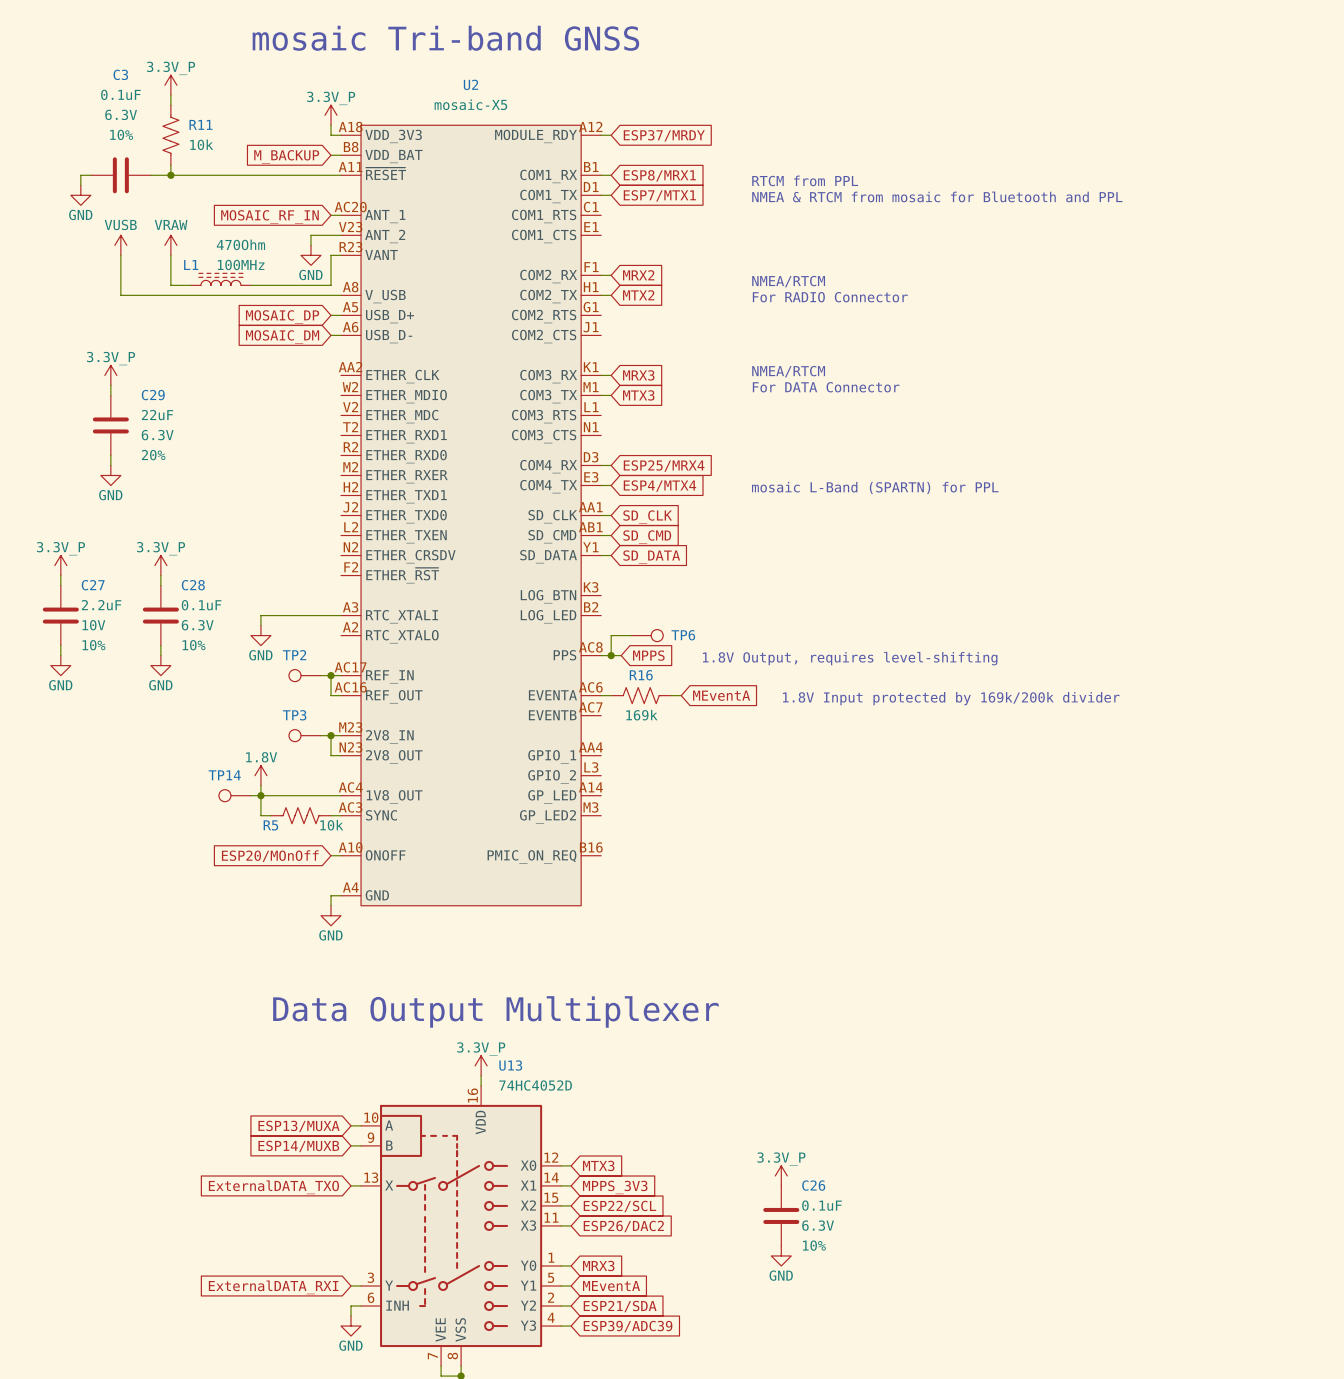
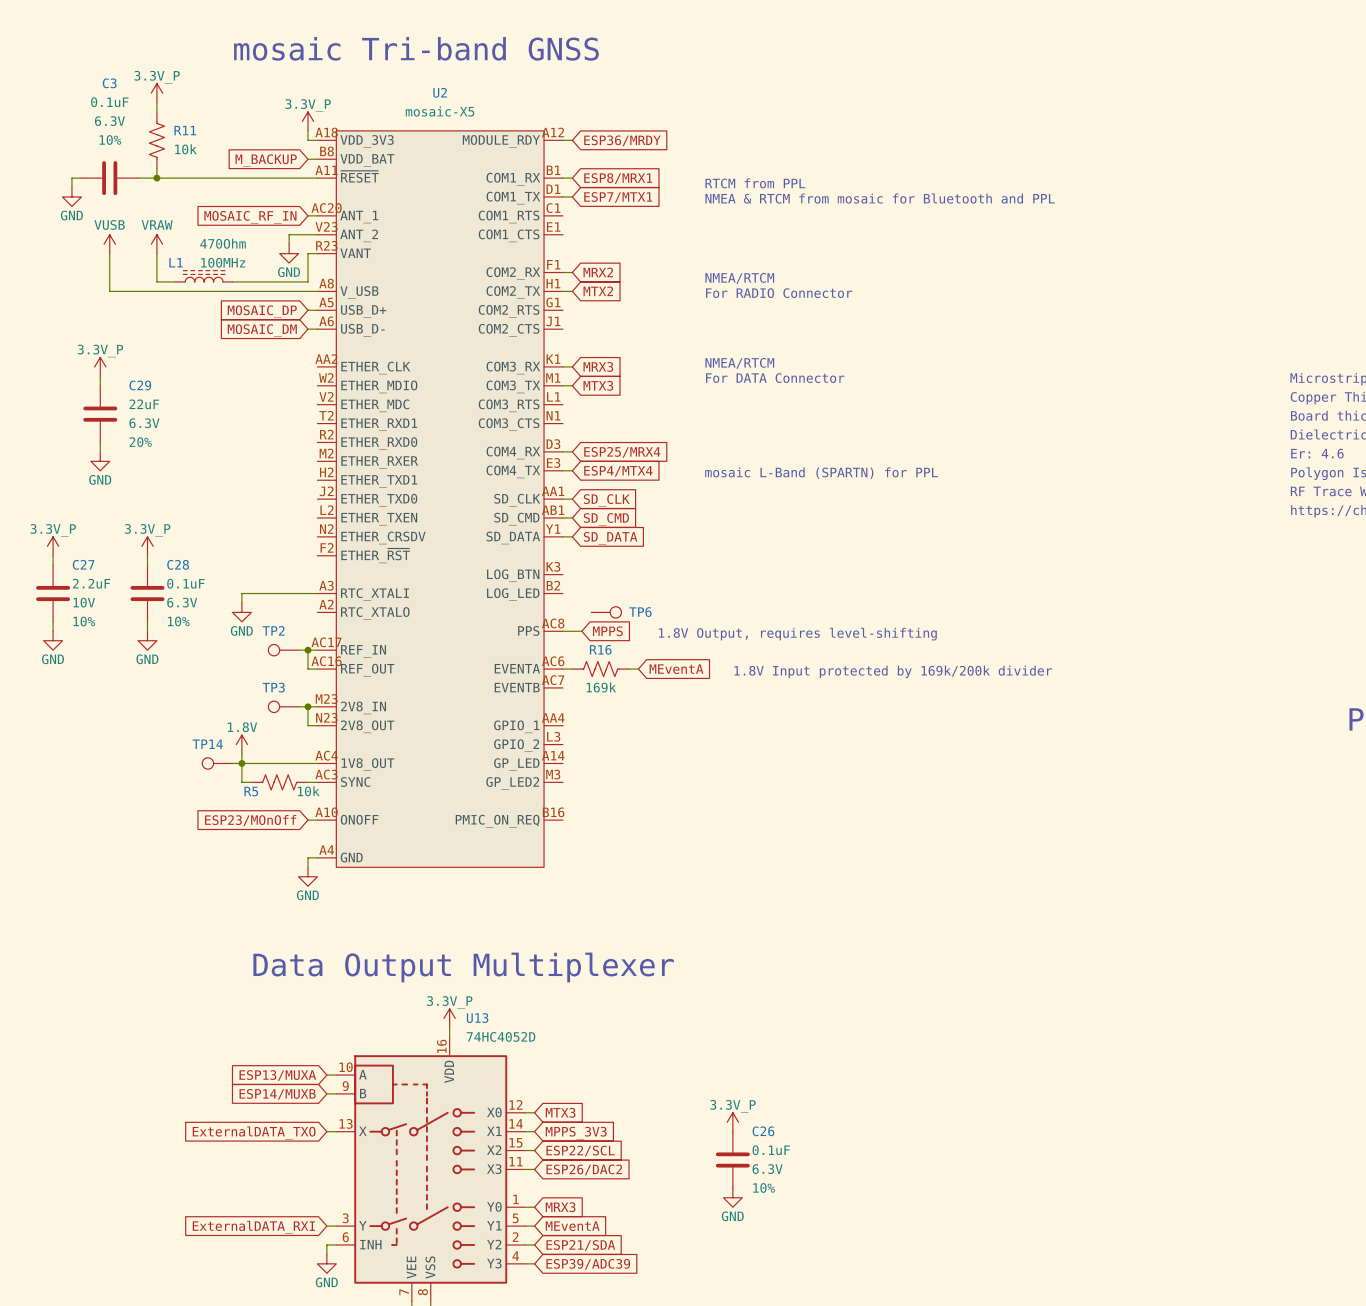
global label: ESP37/MRDY (664, 135) -> ESP36/MRDY (622, 140)
wire: (631, 635) (611, 635) (611, 655) -> none
junction: (611, 655) -> none
global label: ESP20/MOnOff (270, 856) -> ESP23/MOnOff (250, 820)

